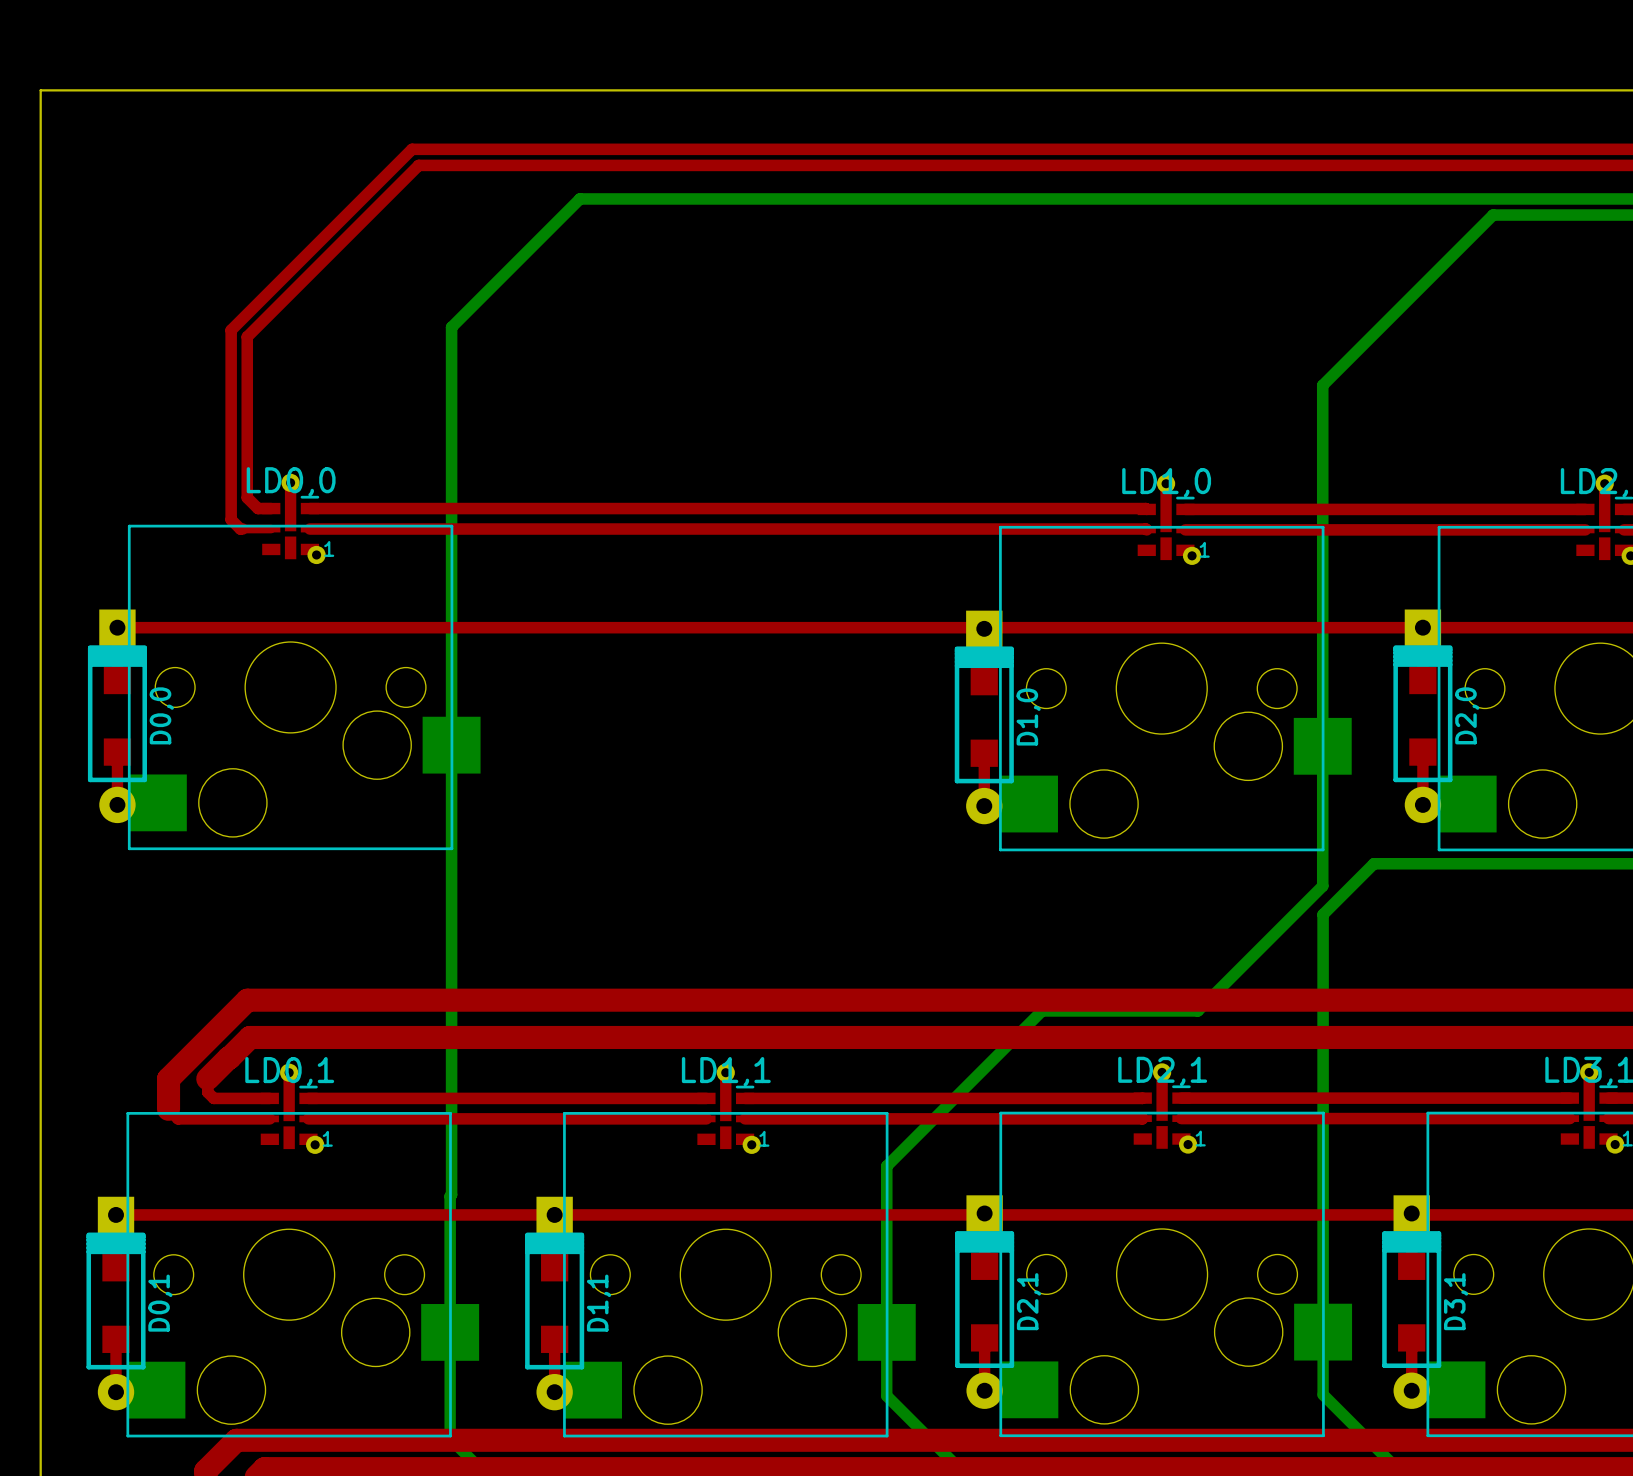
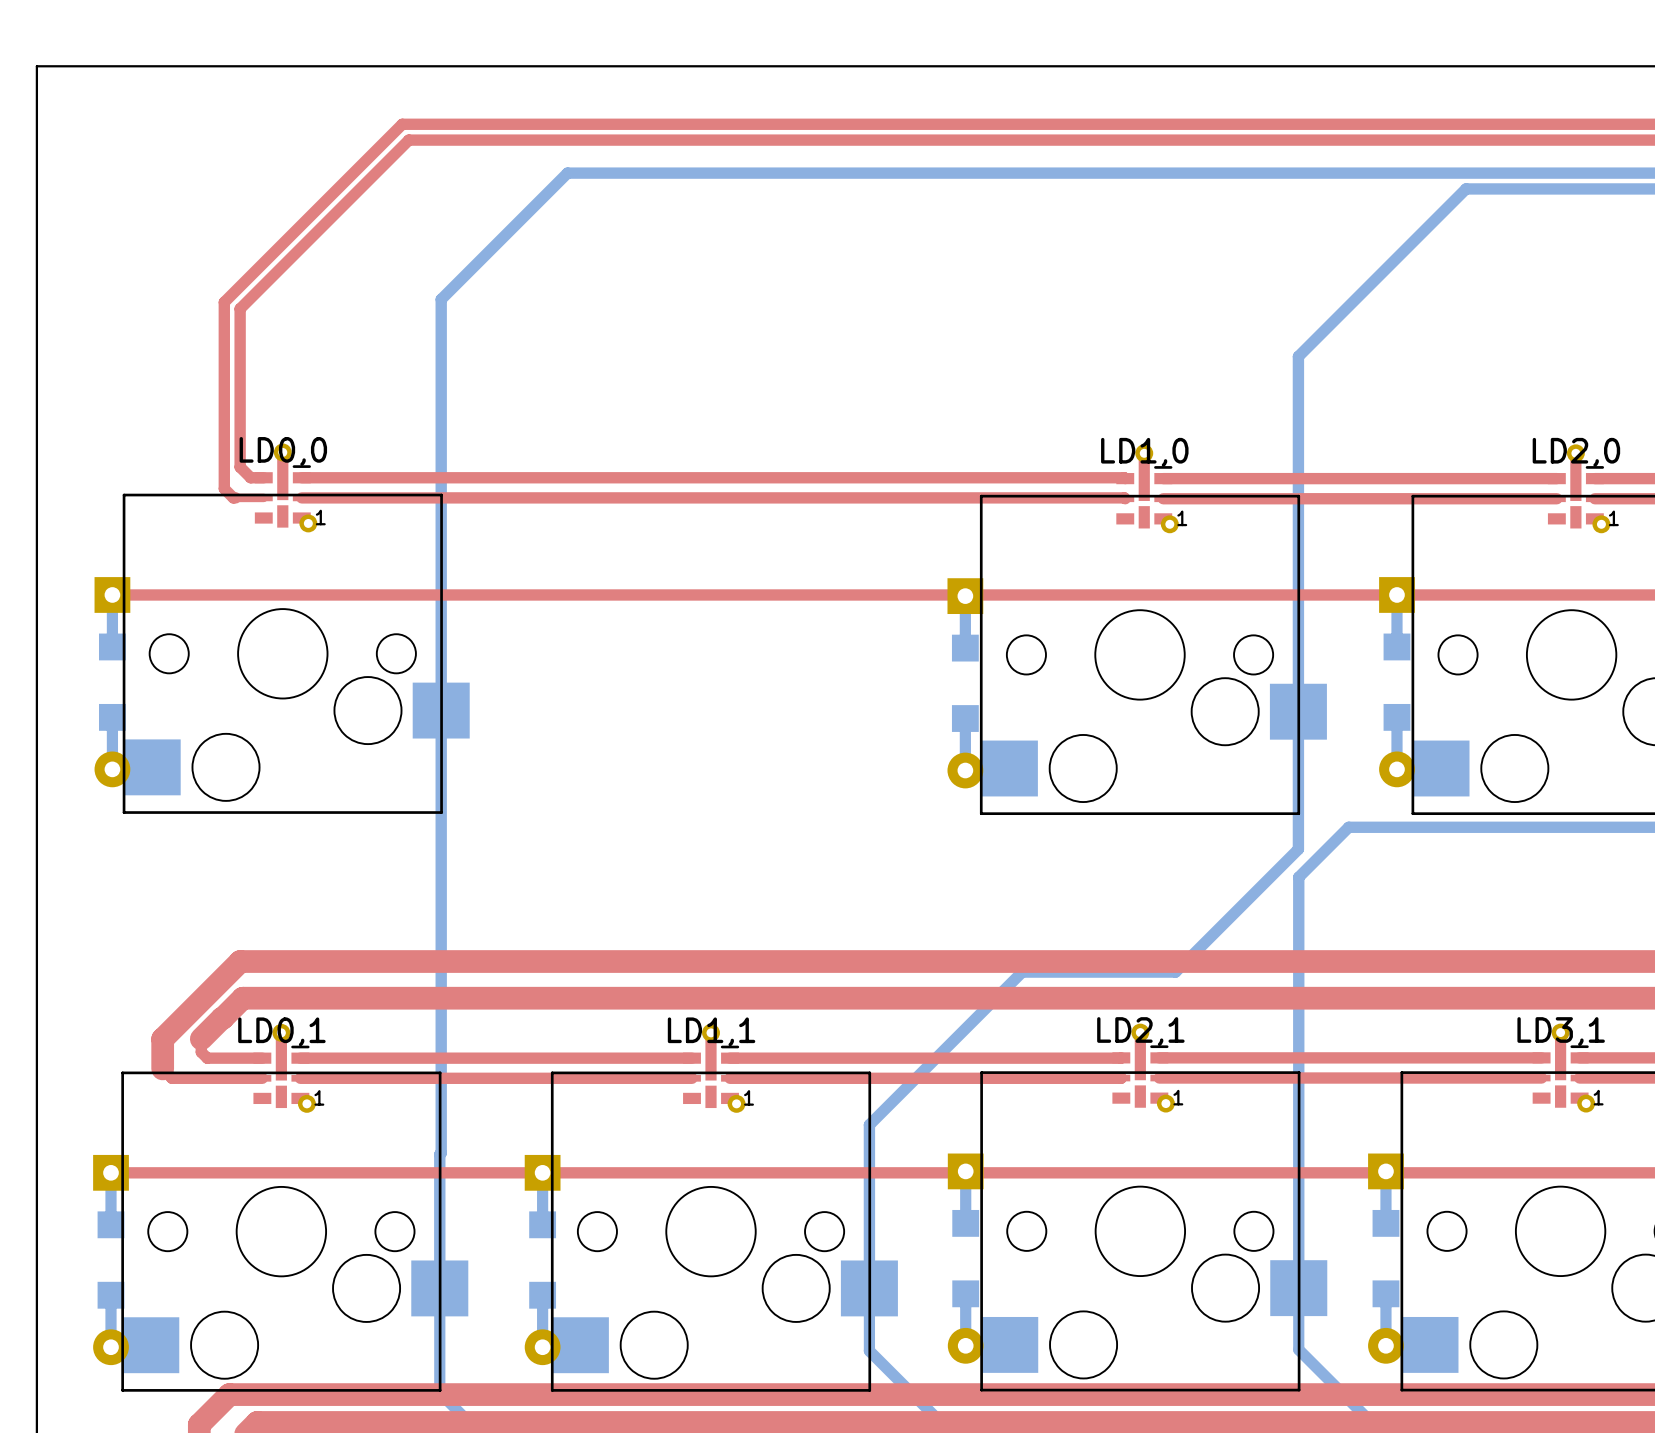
D0,0 side: top (117, 716) -> bottom (112, 682)
D2,0 side: top (1422, 716) -> bottom (1396, 682)
D1,0 side: top (984, 717) -> bottom (965, 683)
D2,1 side: top (984, 1302) -> bottom (965, 1258)
D3,1 side: top (1411, 1302) -> bottom (1385, 1258)
D0,1 side: top (116, 1303) -> bottom (111, 1260)
D1,1 side: top (554, 1303) -> bottom (542, 1260)

